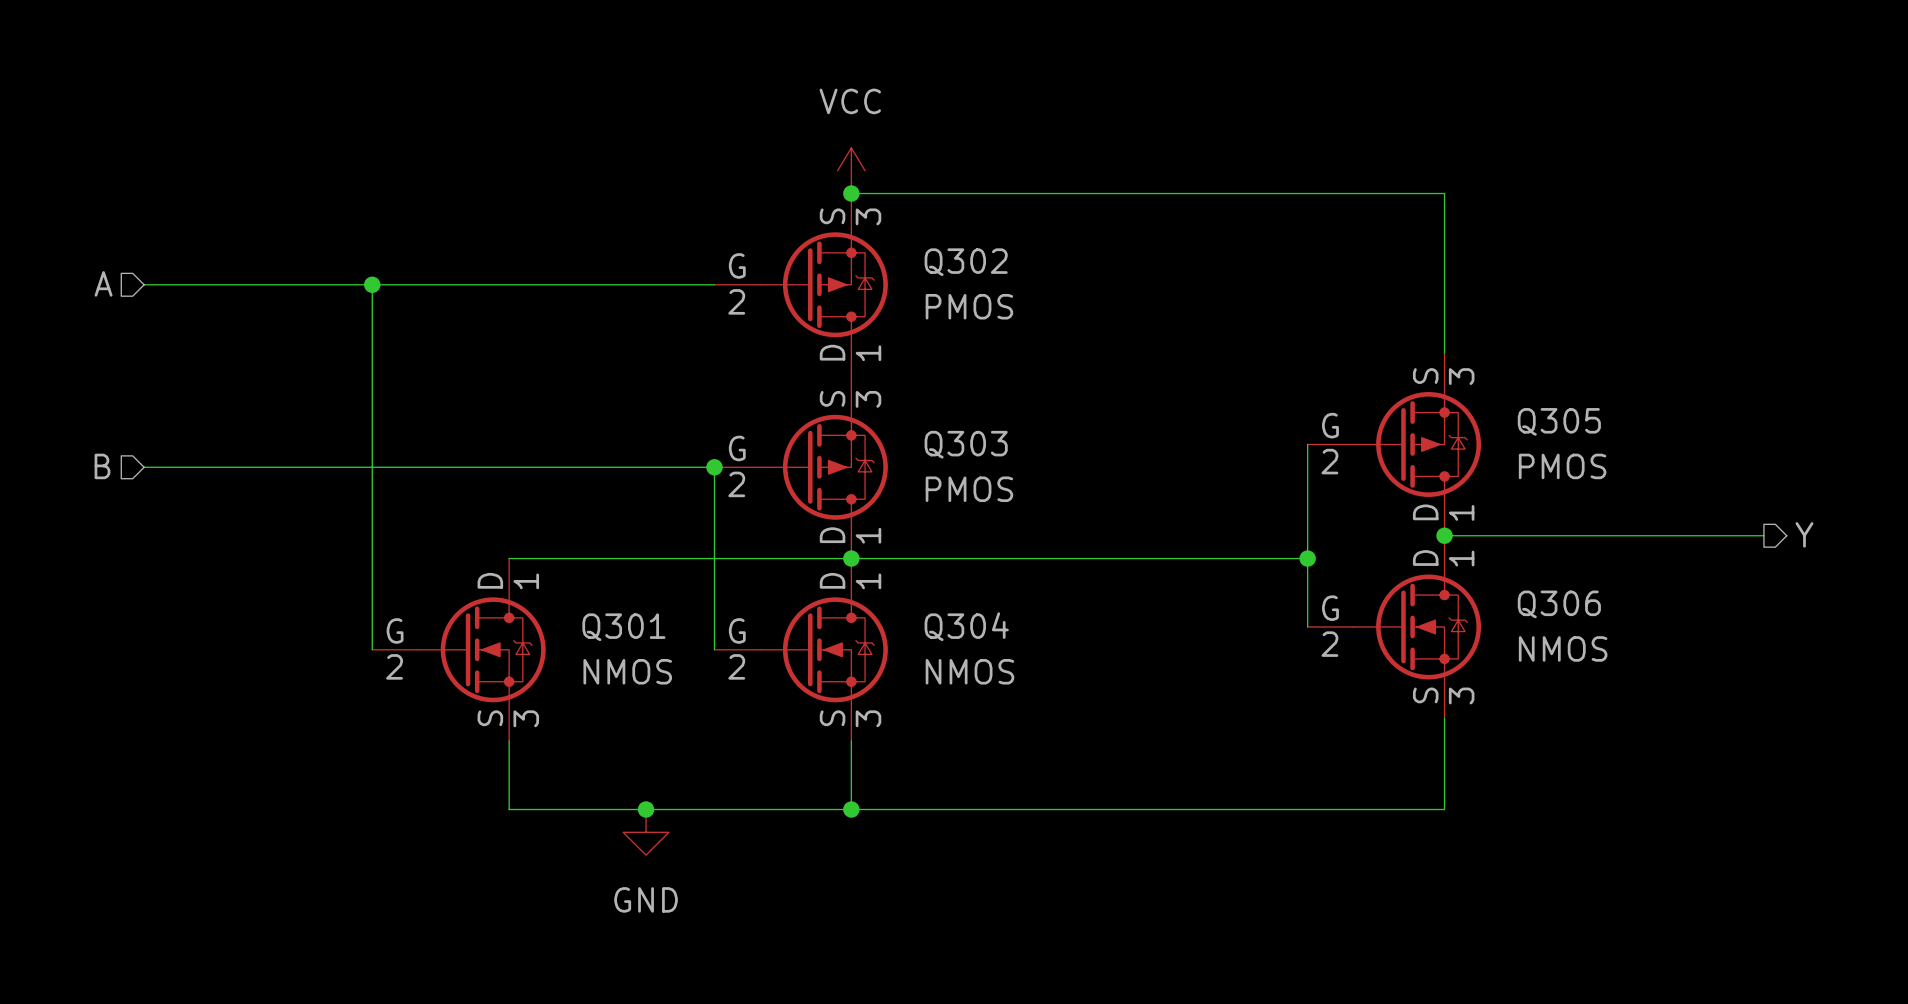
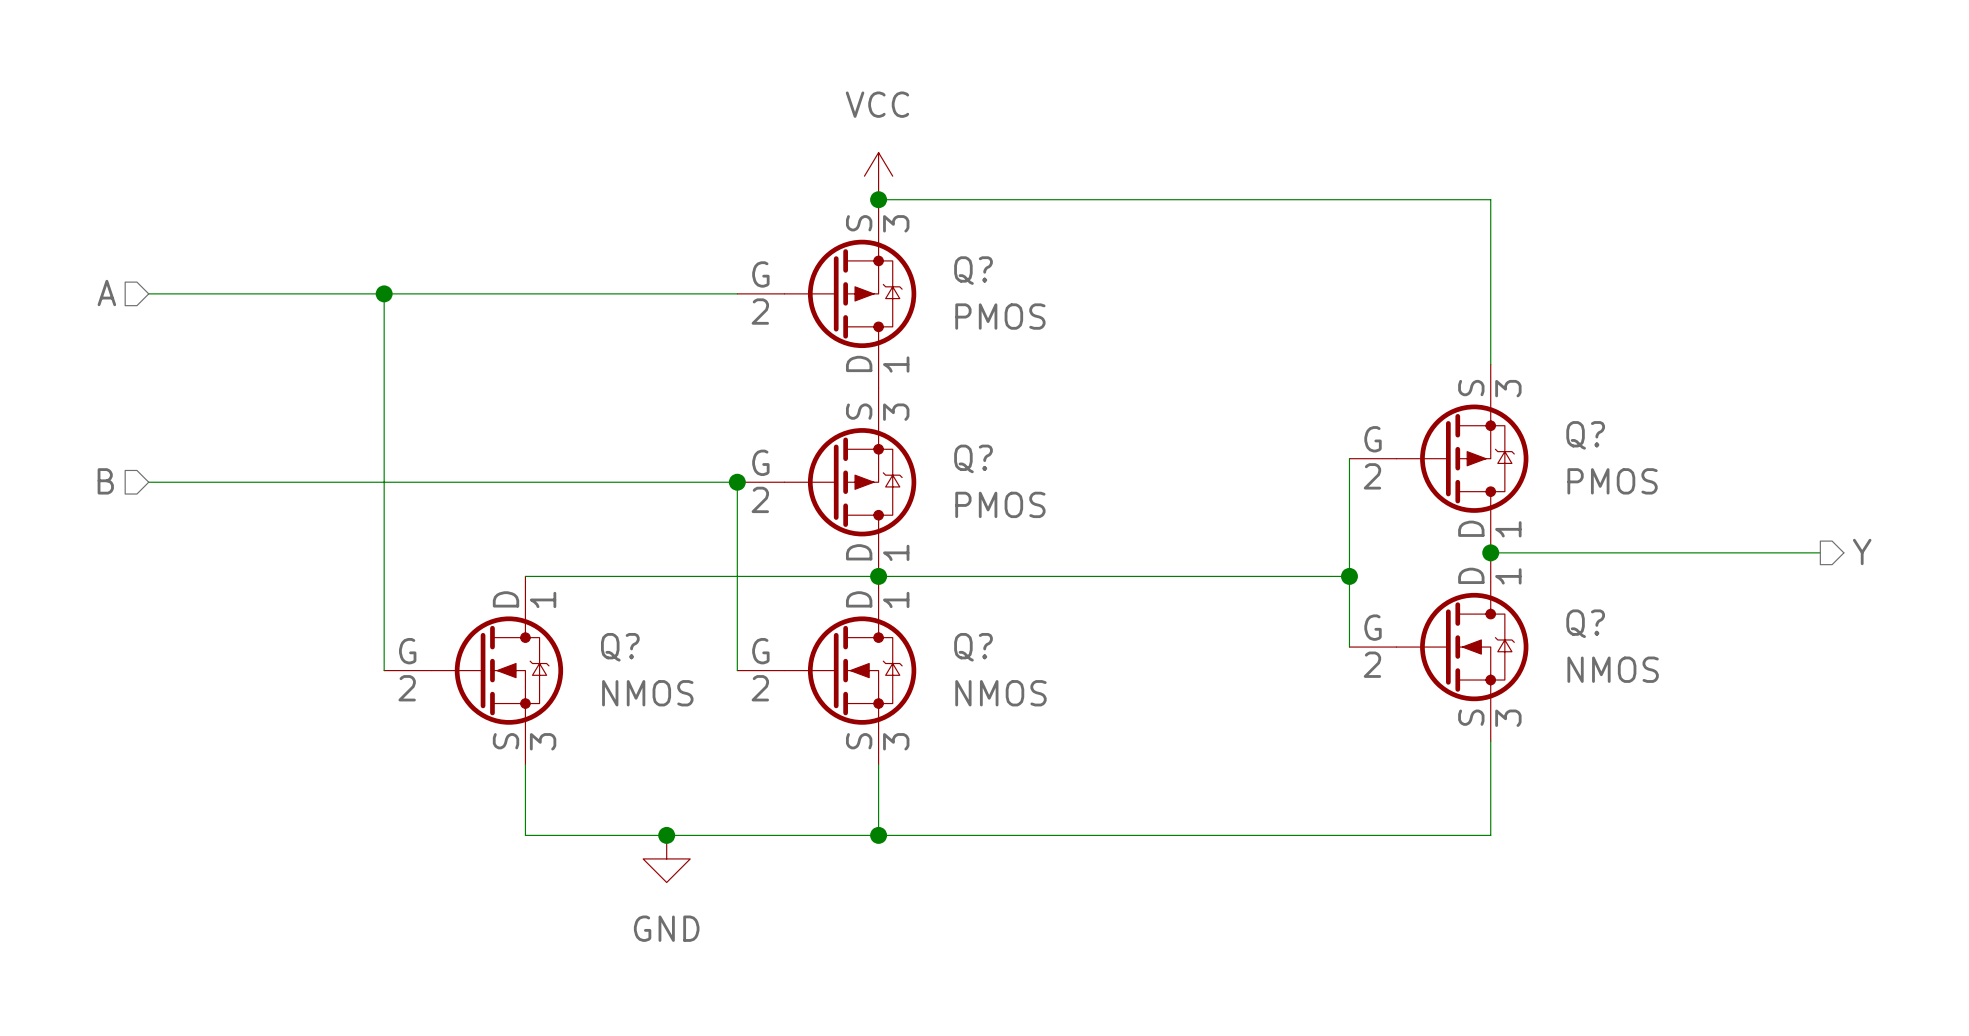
Q302 name: Q302 (966, 262) -> Q? (973, 270)
Q305 name: Q305 (1559, 421) -> Q? (1585, 435)
Q303 name: Q303 (966, 444) -> Q? (973, 458)
Q306 name: Q306 (1559, 604) -> Q? (1585, 623)
Q304 name: Q304 (966, 626) -> Q? (973, 647)
Q301 name: Q301 (623, 627) -> Q? (620, 647)

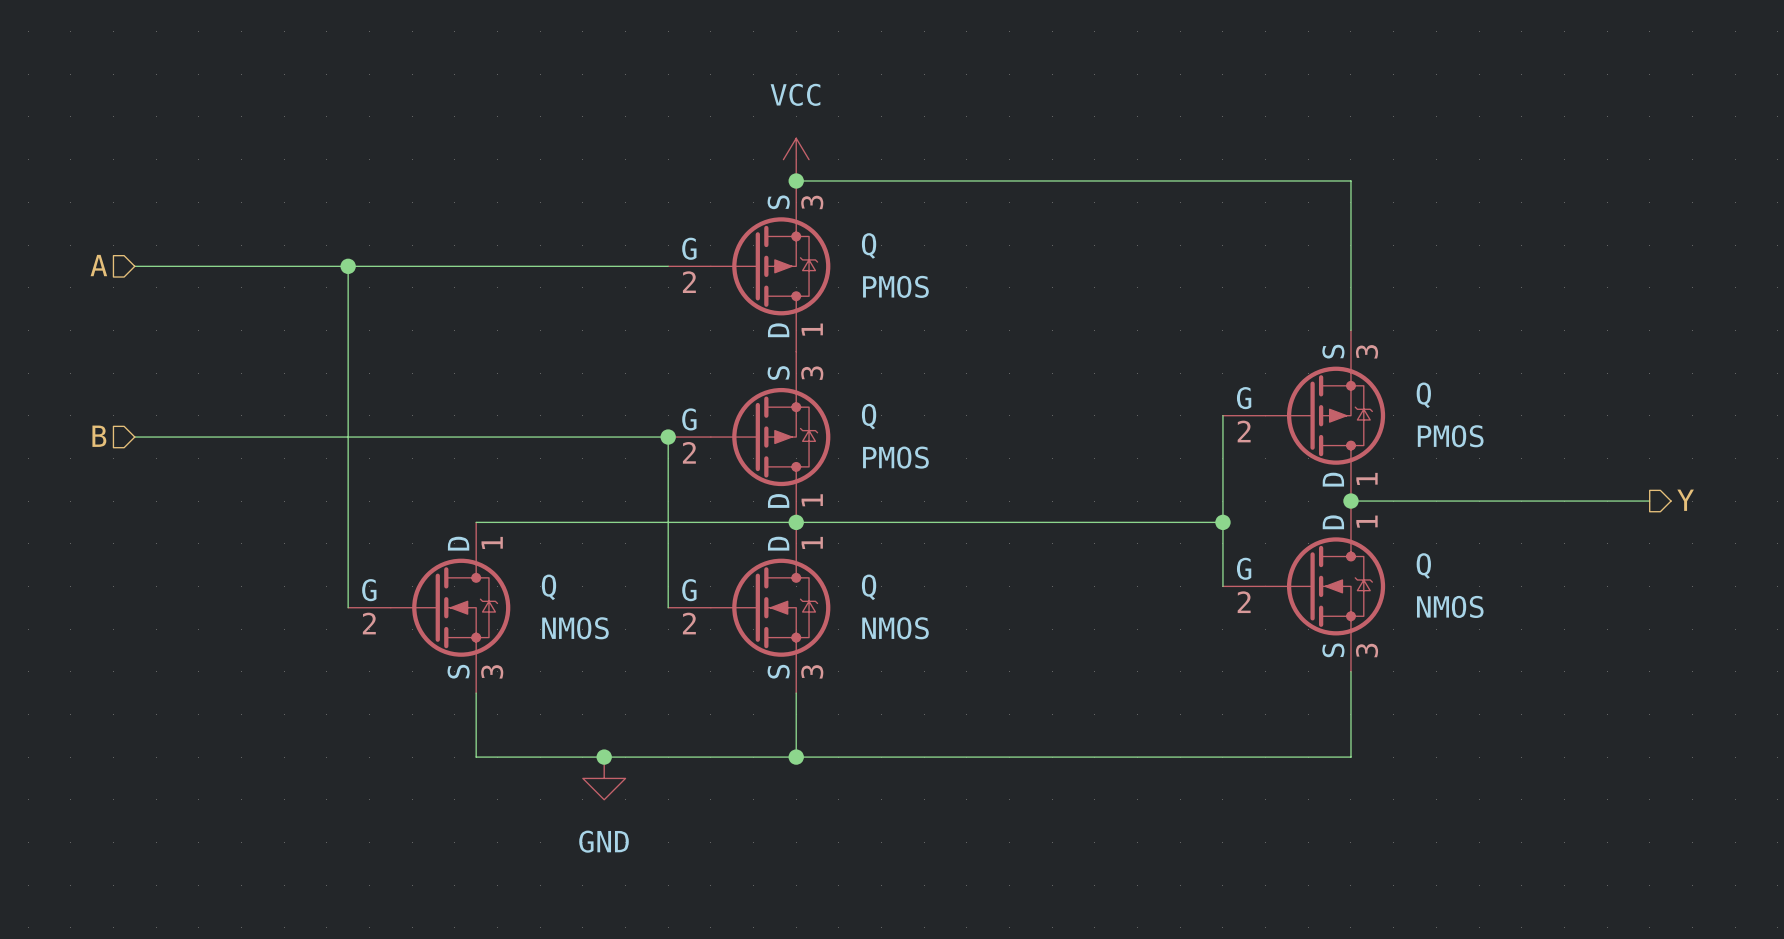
Q? name: Q? (973, 270) -> Q (869, 245)
Q? name: Q? (1585, 435) -> Q (1423, 395)
Q? name: Q? (973, 458) -> Q (869, 416)
Q? name: Q? (1585, 623) -> Q (1423, 565)
Q? name: Q? (620, 647) -> Q (549, 587)
Q? name: Q? (973, 647) -> Q (869, 587)

